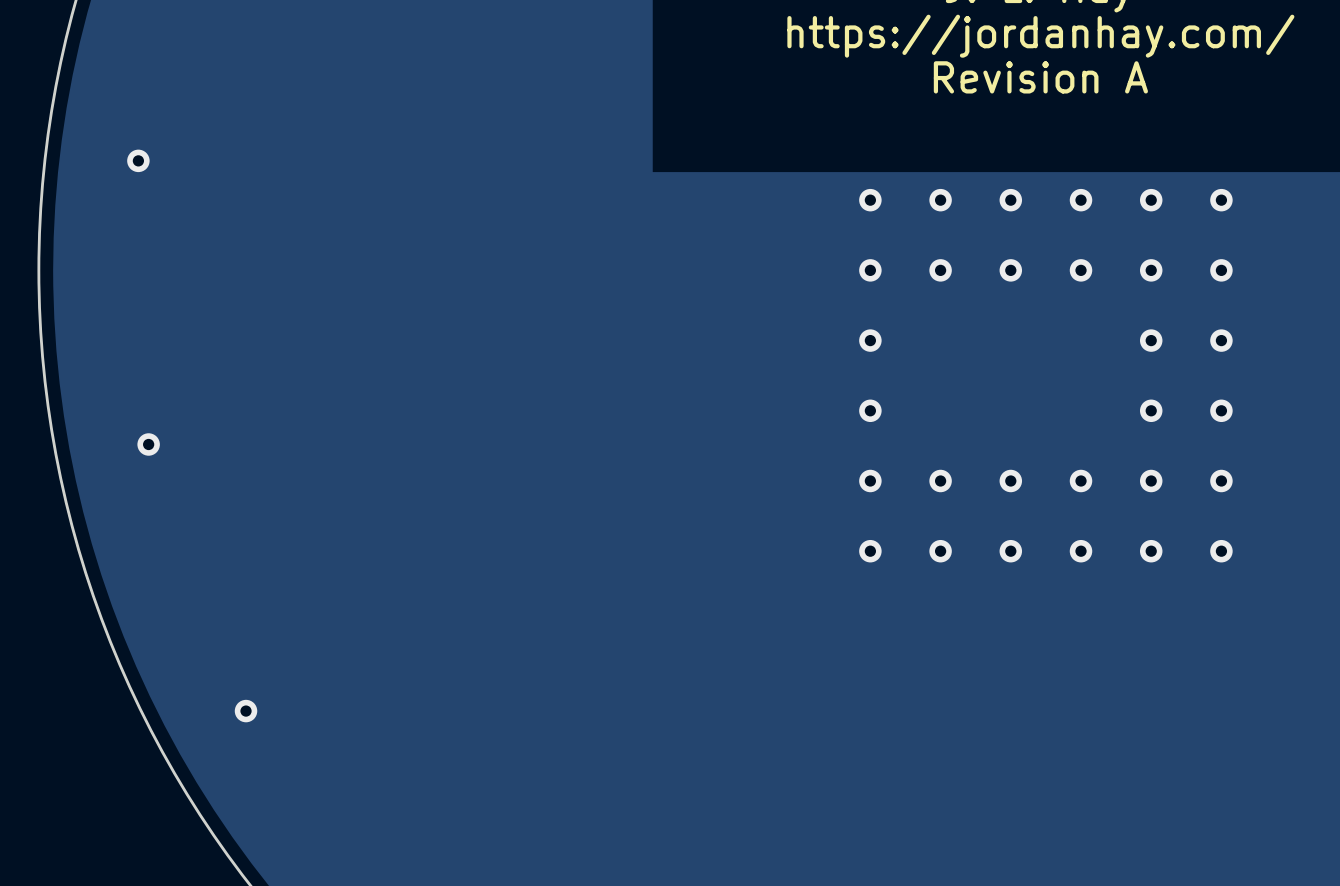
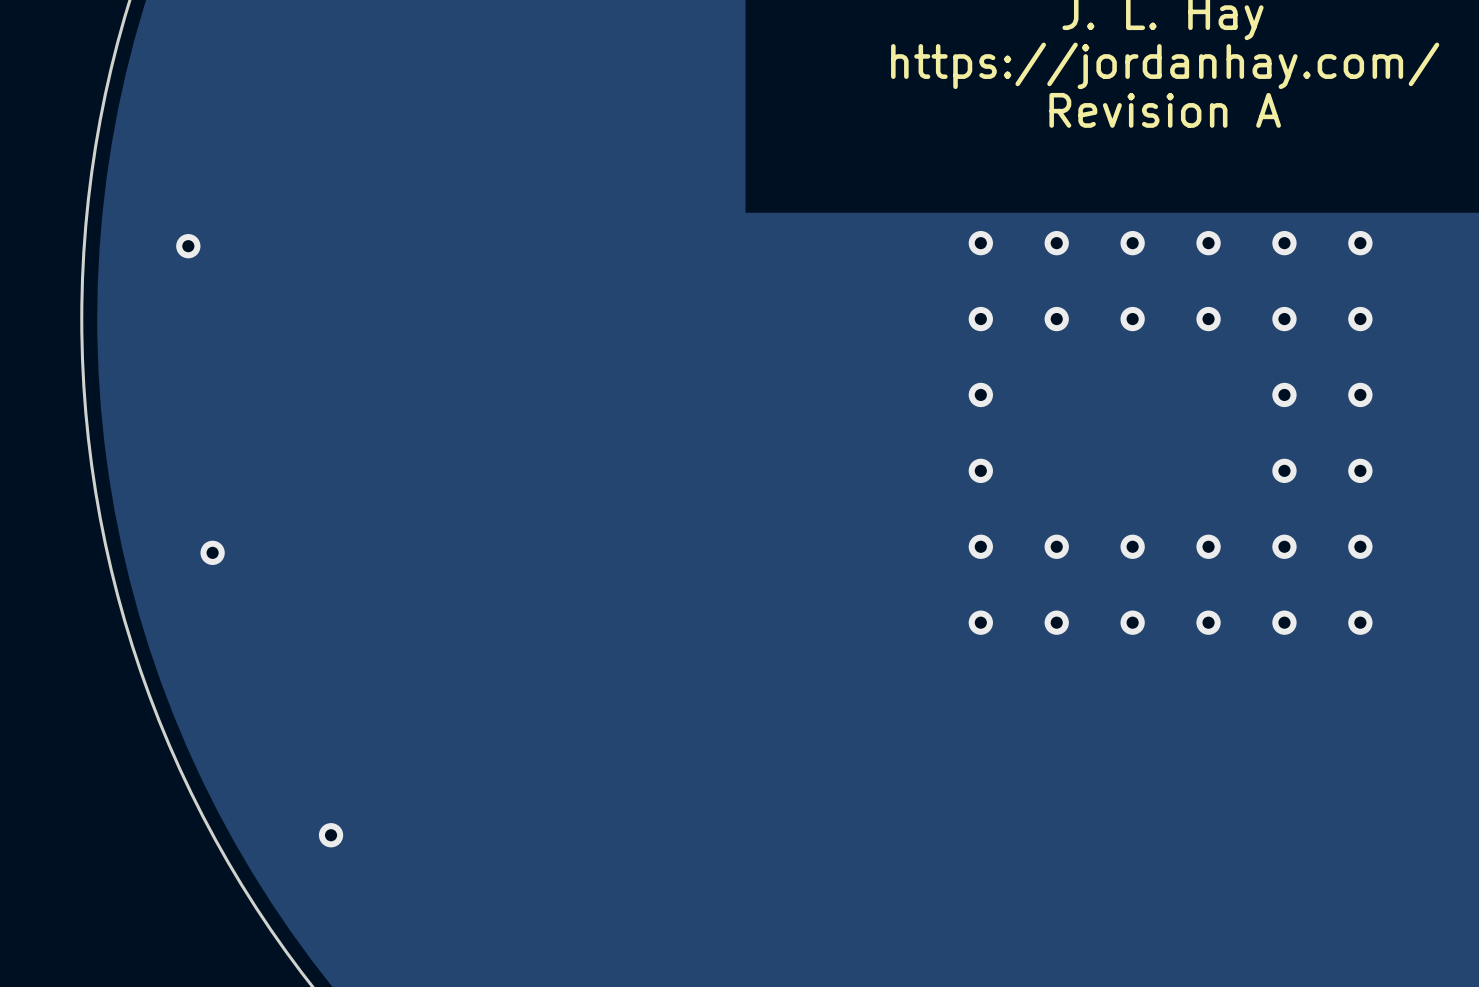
via position: (138, 160) -> (188, 246)
via position: (148, 444) -> (212, 552)
via position: (246, 711) -> (331, 835)

